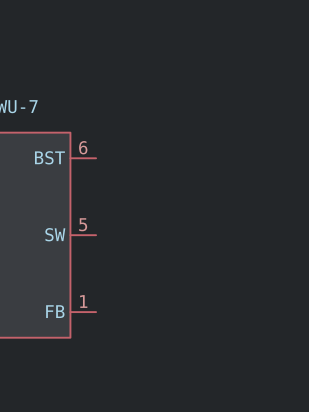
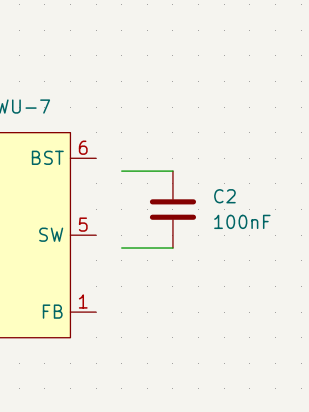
wire: none -> (121, 171) (172, 171)
C2: none -> 100nF (172, 209)
wire: none -> (121, 248) (172, 248)

